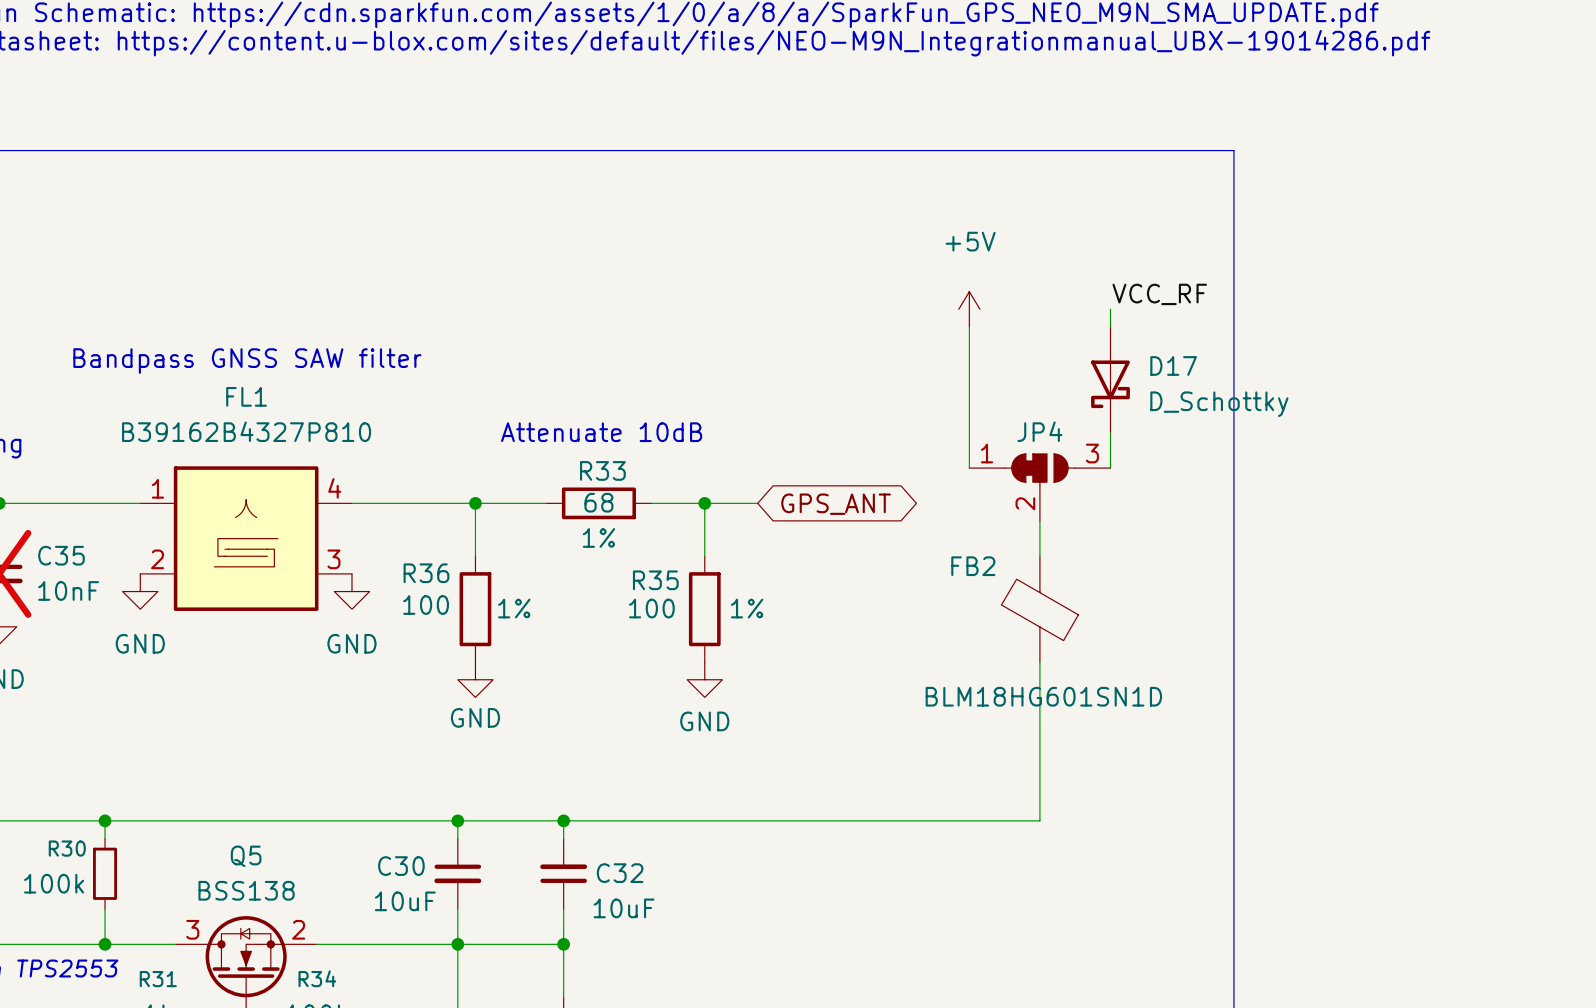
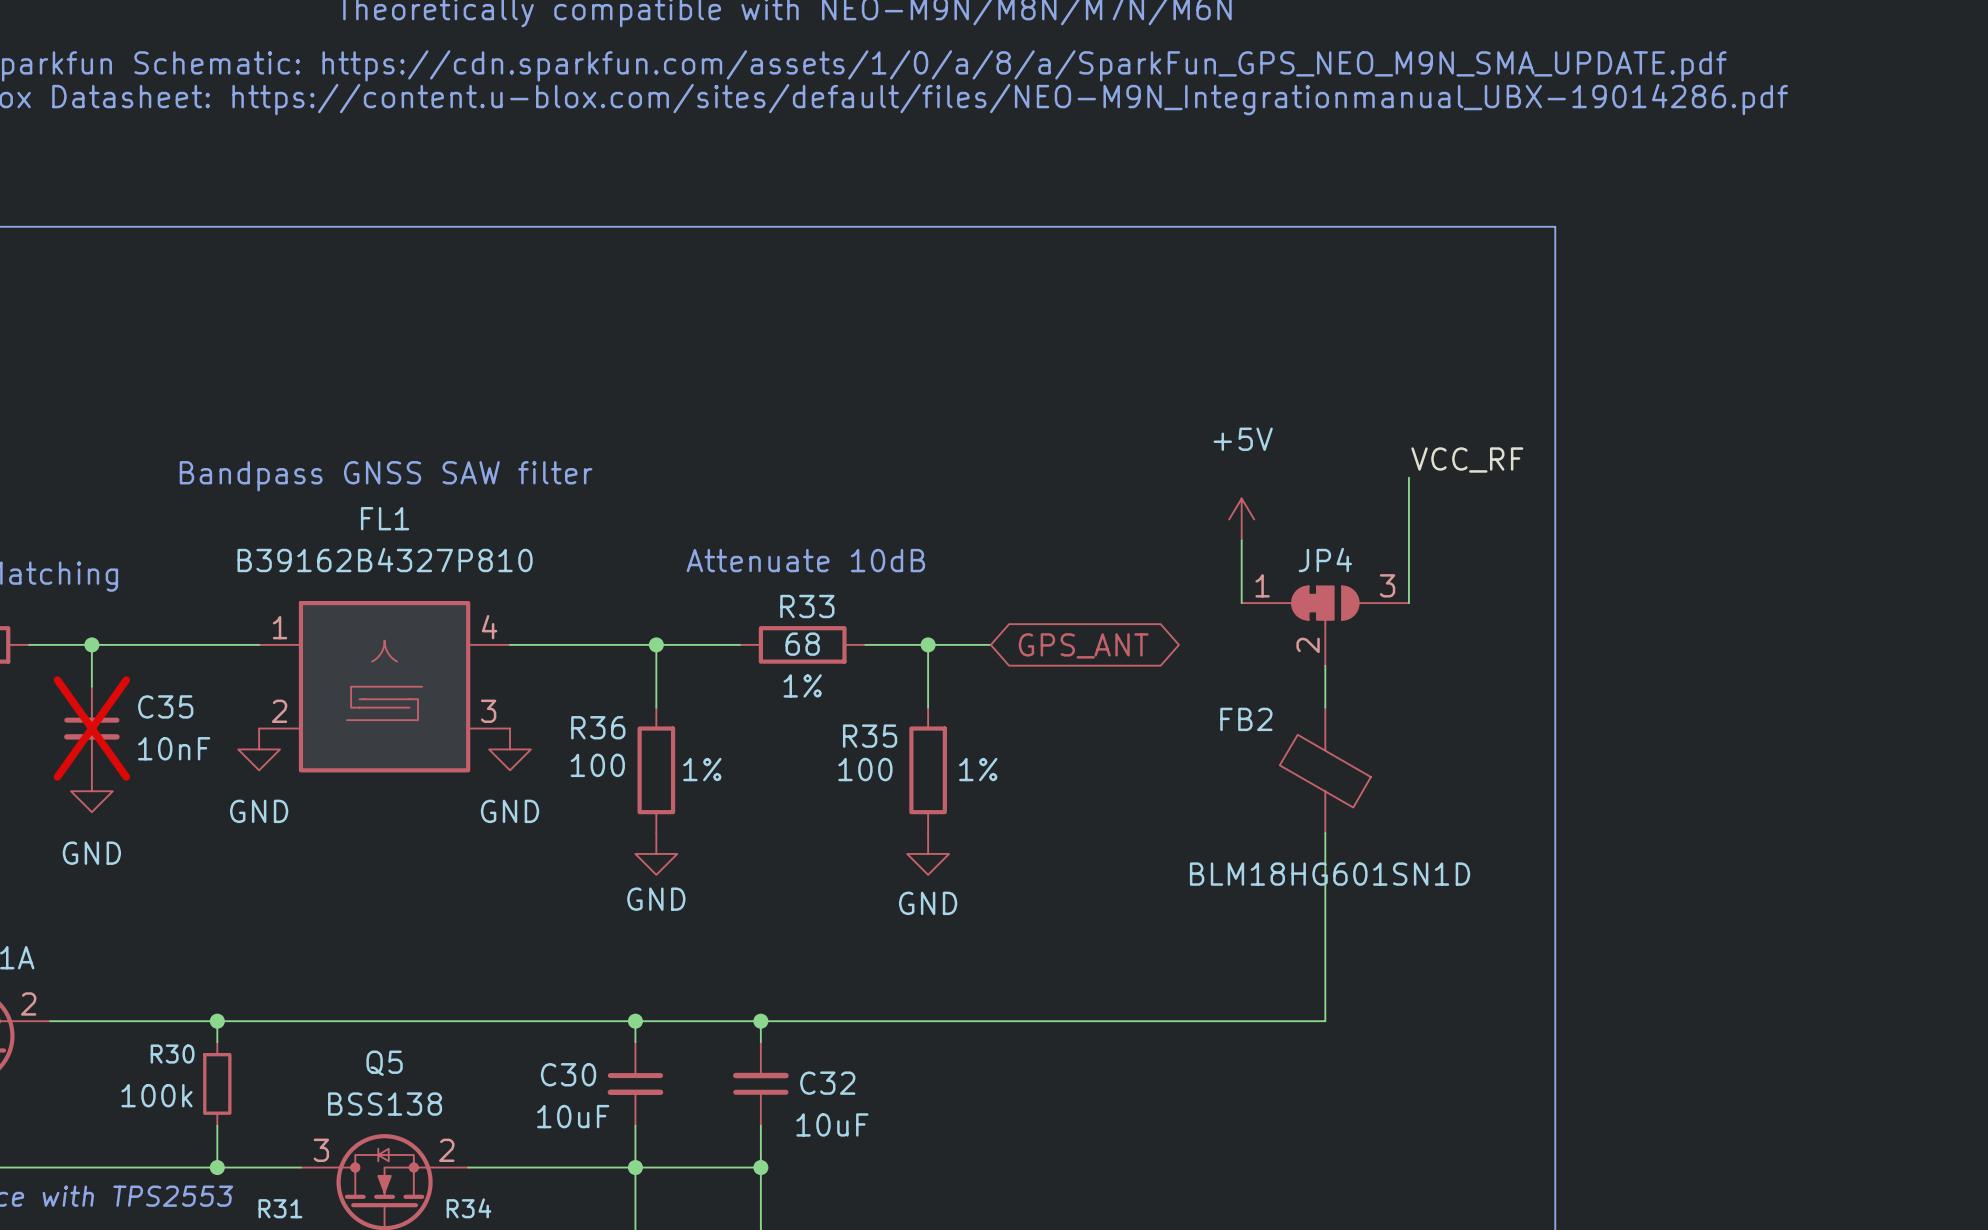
label position: VCC_RF (1159, 294) -> VCC_RF (1467, 460)
power symbol position: +5V (969, 309) -> +5V (1241, 519)
wire: (1110, 309) (1110, 326) -> none
wire: (969, 326) (969, 415) -> none
D17: D_Schottky (1110, 379) -> none

